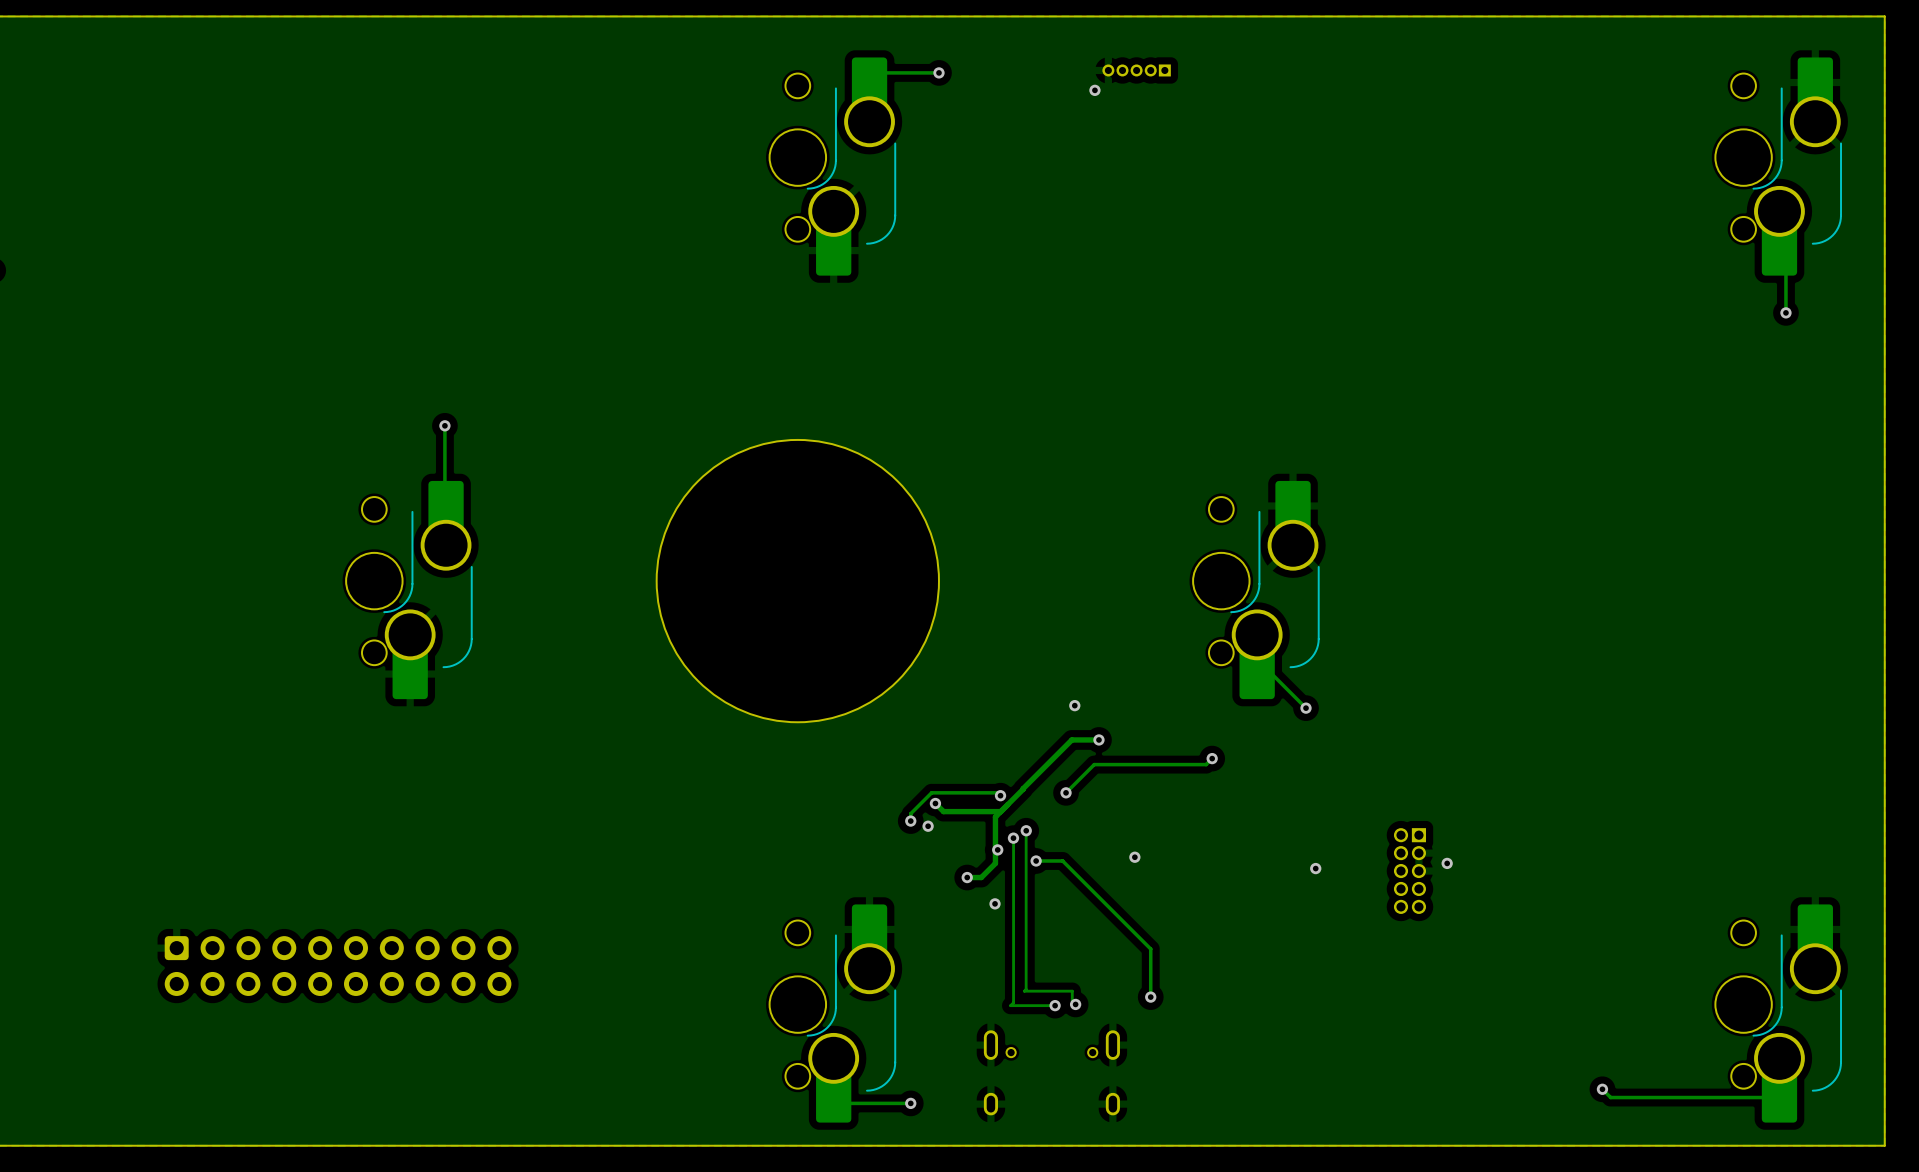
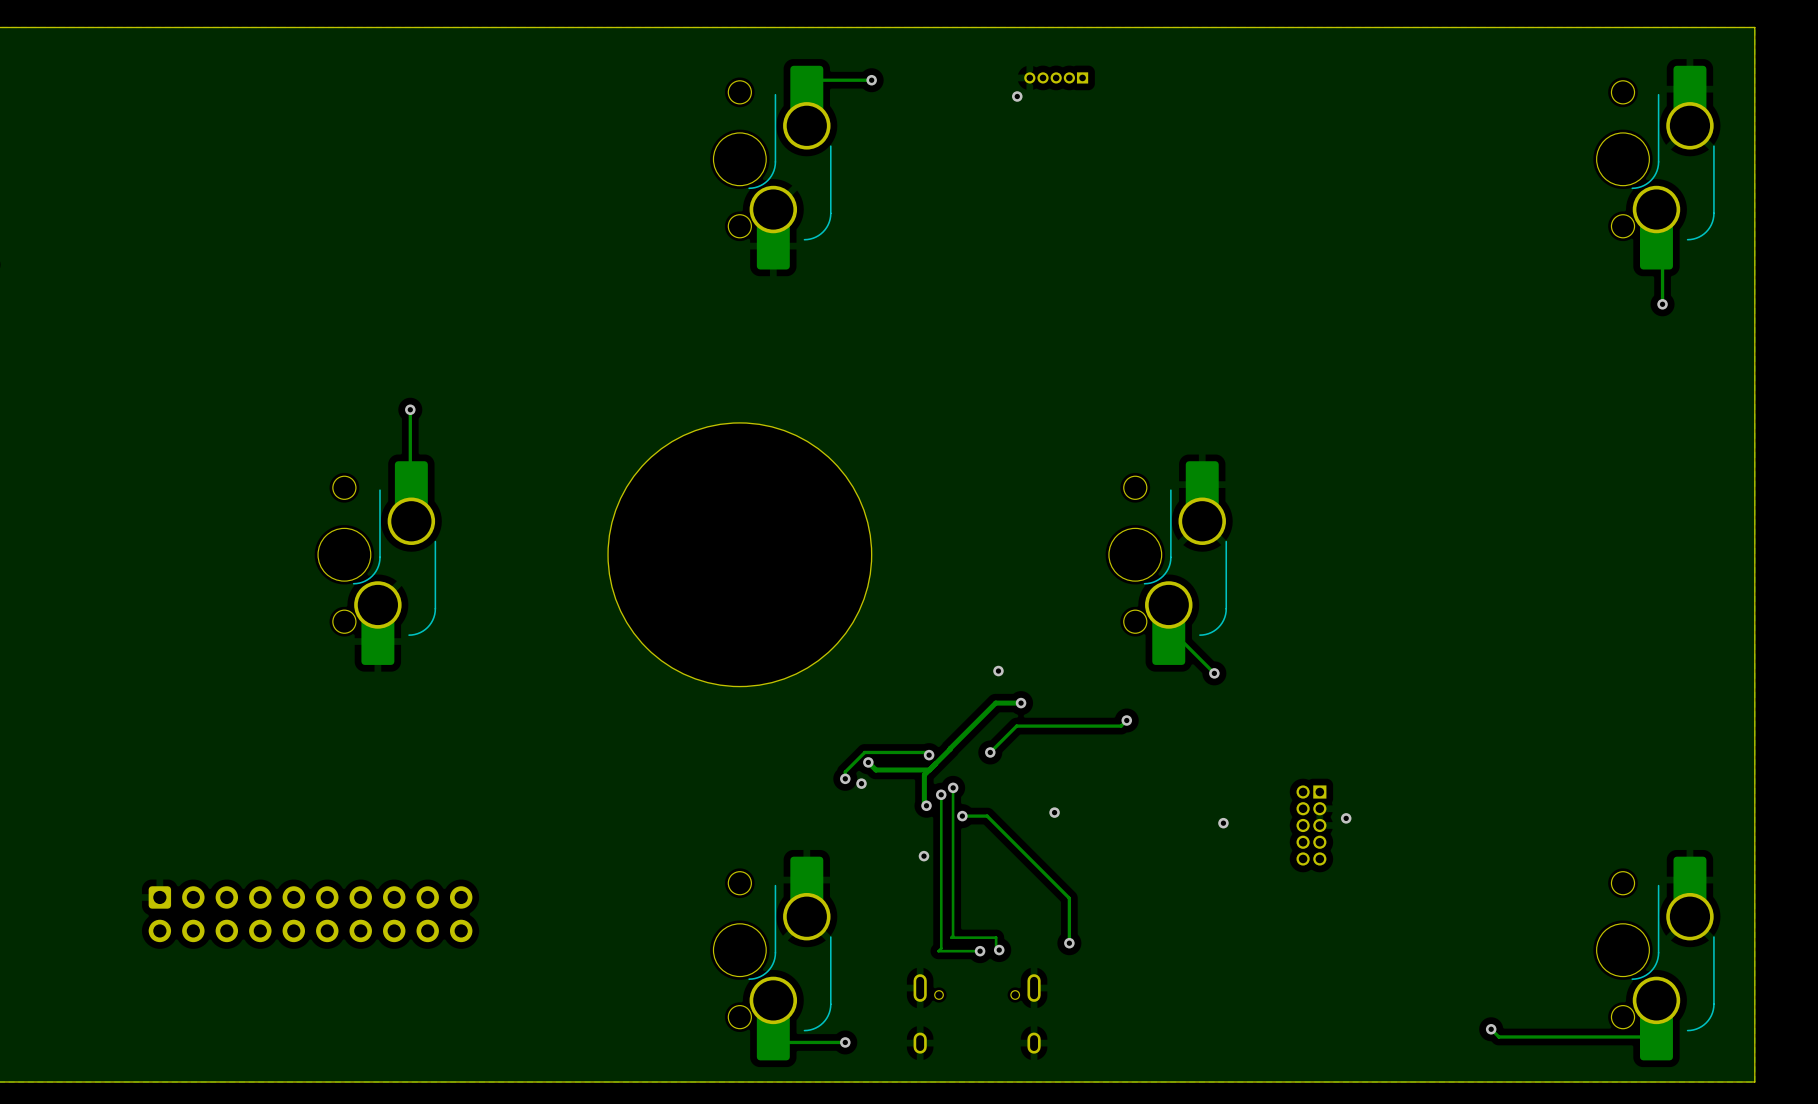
track: (995, 849) (995, 863) (981, 877) (967, 877) -> none
via: (967, 877) -> none

